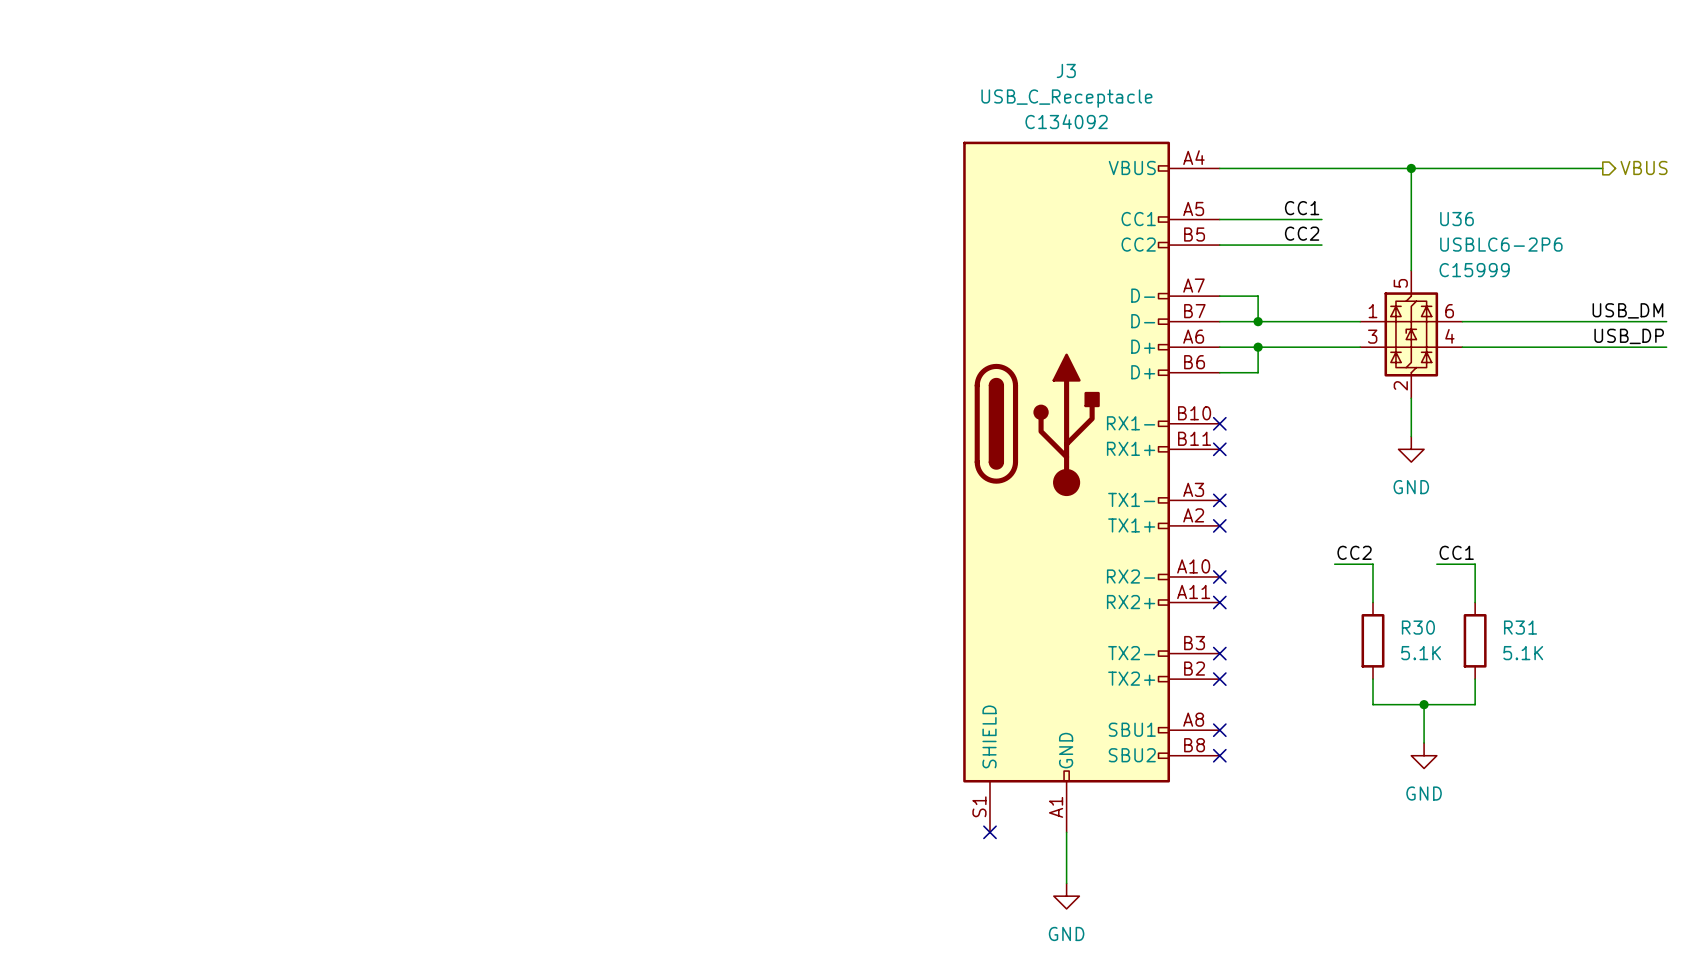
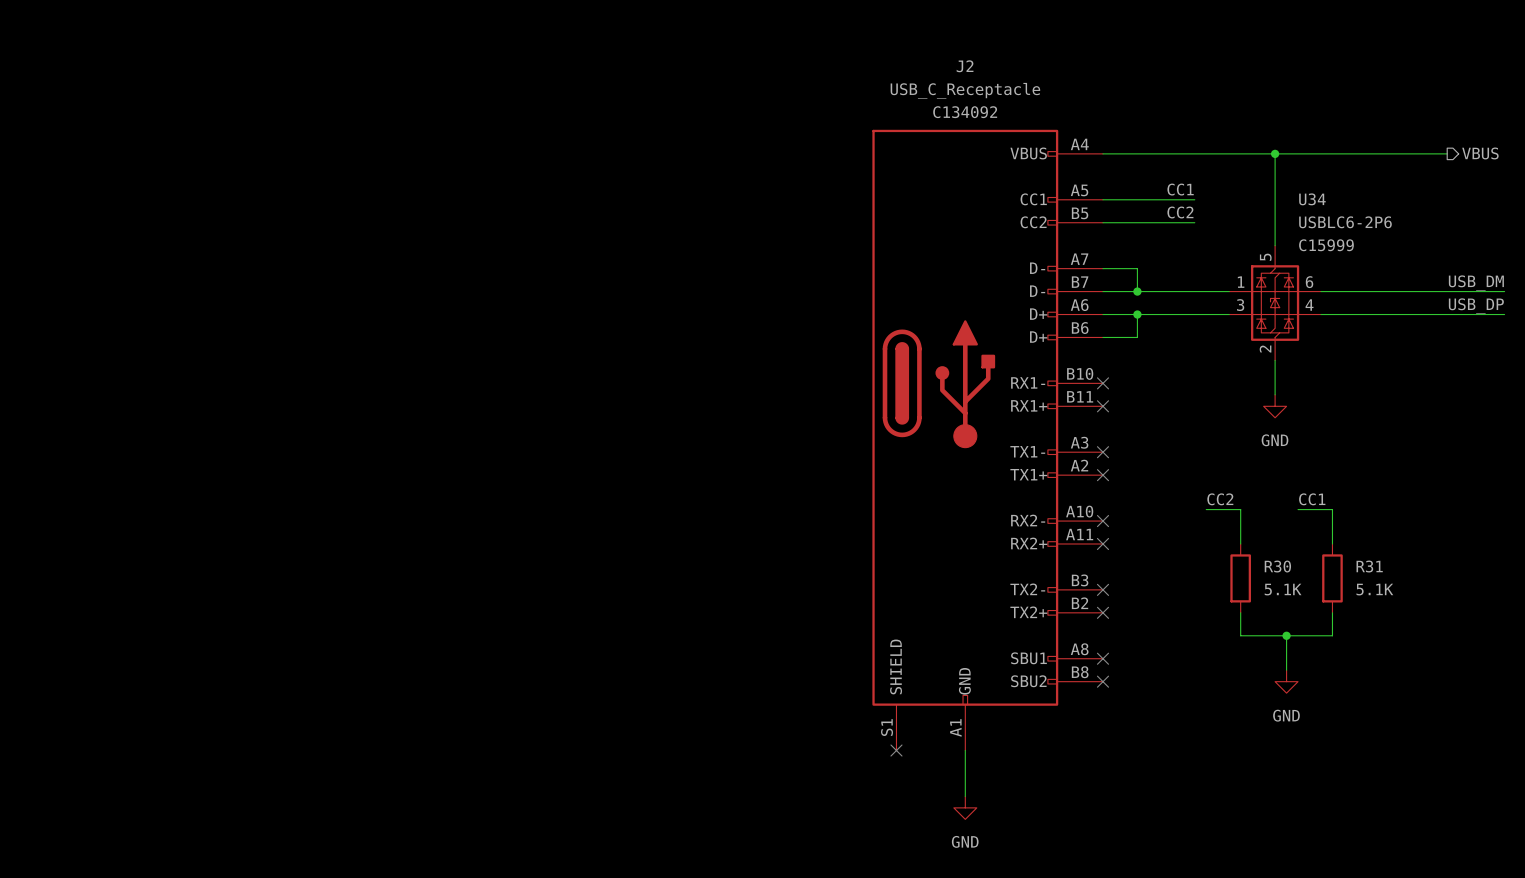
J3 name: J3 (1066, 70) -> J2 (965, 66)
U36 name: U36 (1456, 219) -> U34 (1312, 199)

